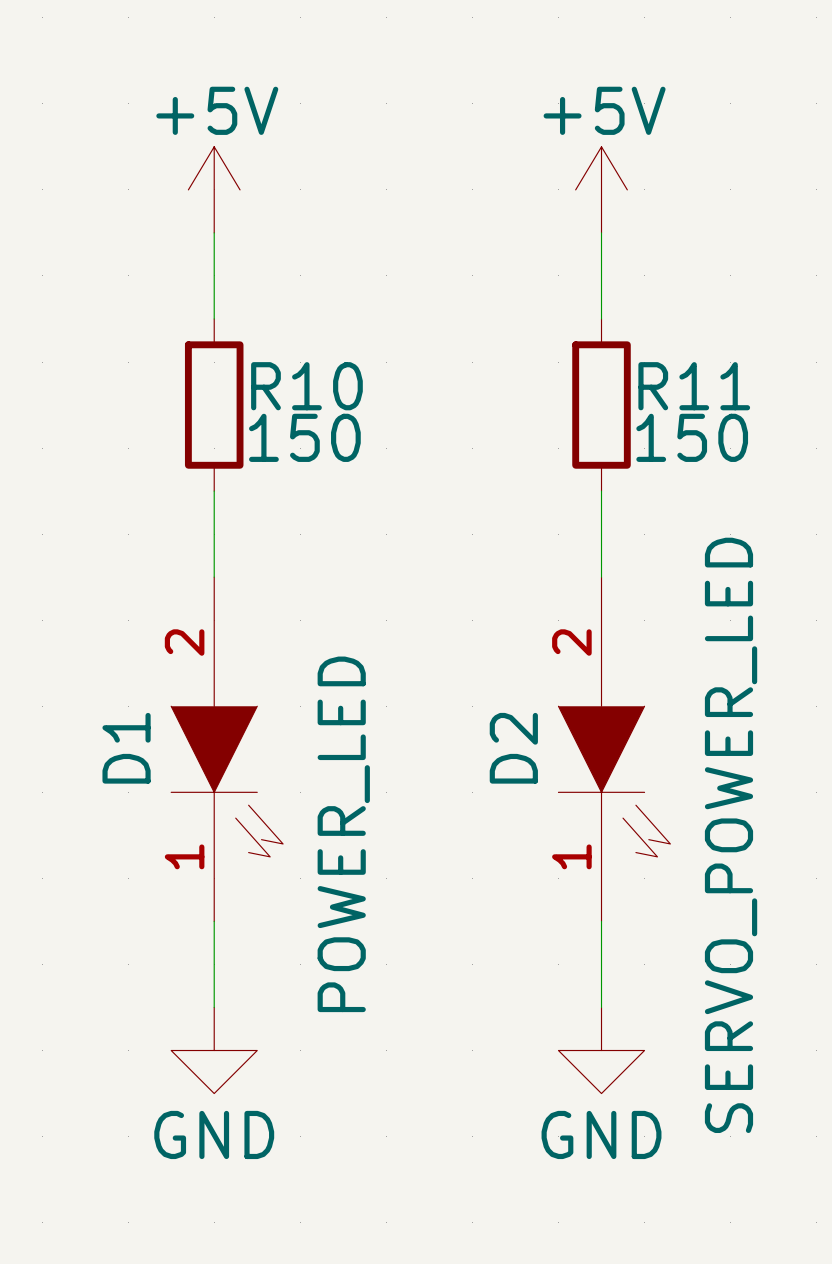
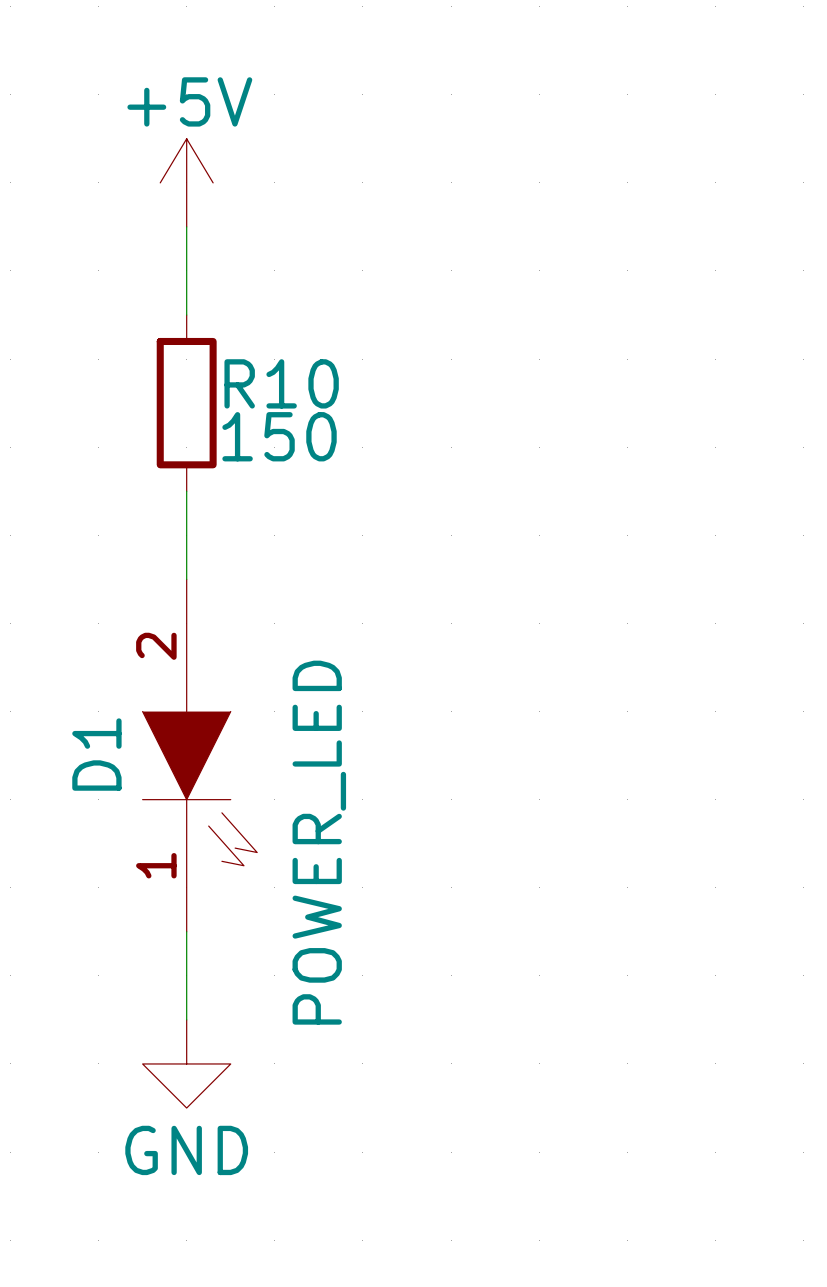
power symbol: +5V (601, 189) -> none
wire: (601, 232) (601, 318) -> none
R11: 150 (601, 405) -> none
wire: (601, 491) (601, 577) -> none
D2: SERVO_POWER_LED (614, 749) -> none
wire: (601, 921) (601, 1007) -> none
power symbol: GND (601, 1050) -> none

